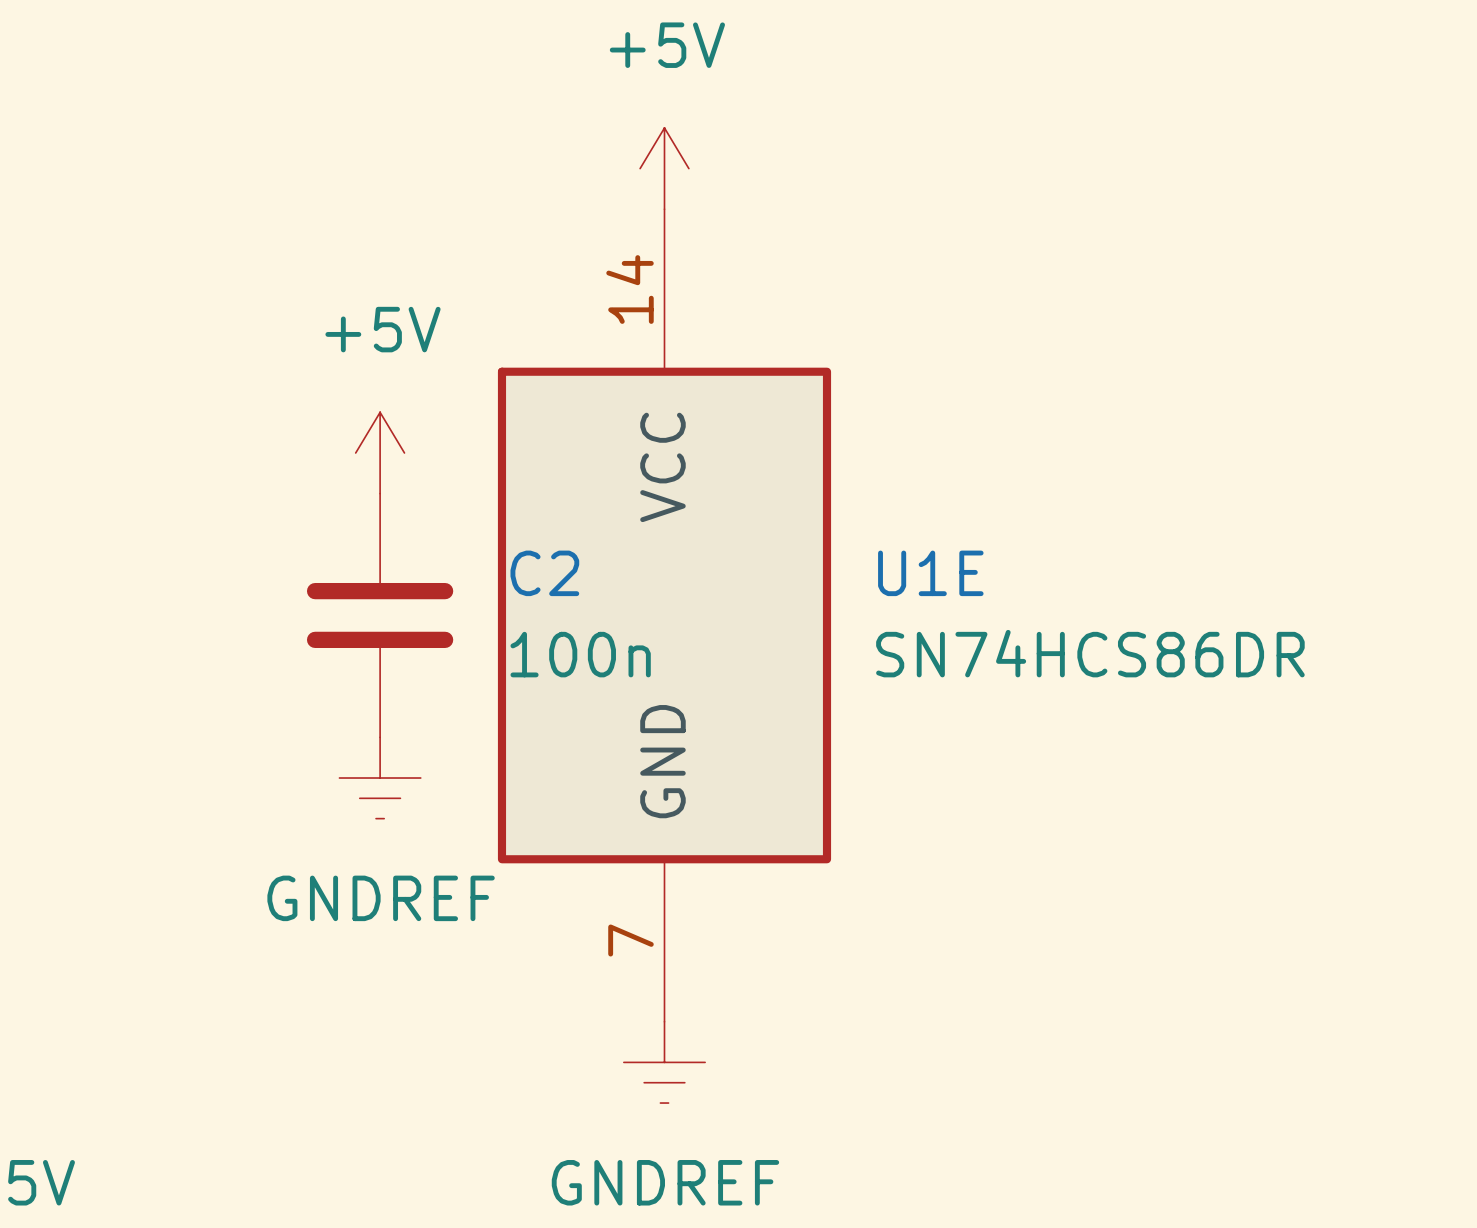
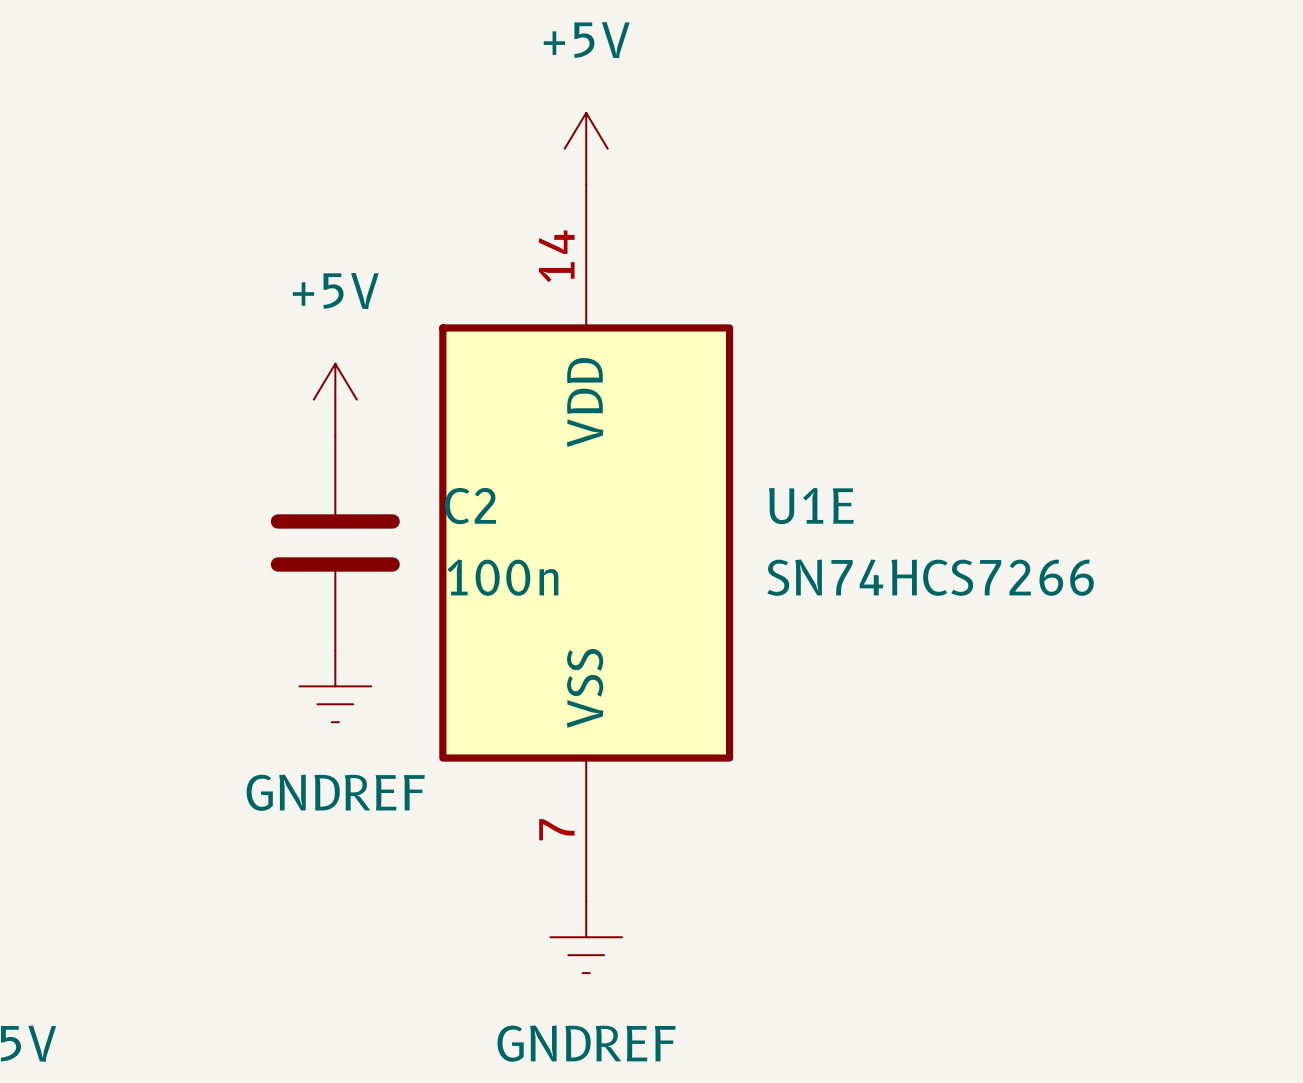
U1E pin name: VCC (662, 467) -> VDD (585, 402)
U1E value: SN74HCS86DR (1090, 653) -> SN74HCS7266 (930, 577)
U1E pin name: GND (662, 761) -> VSS (585, 688)

